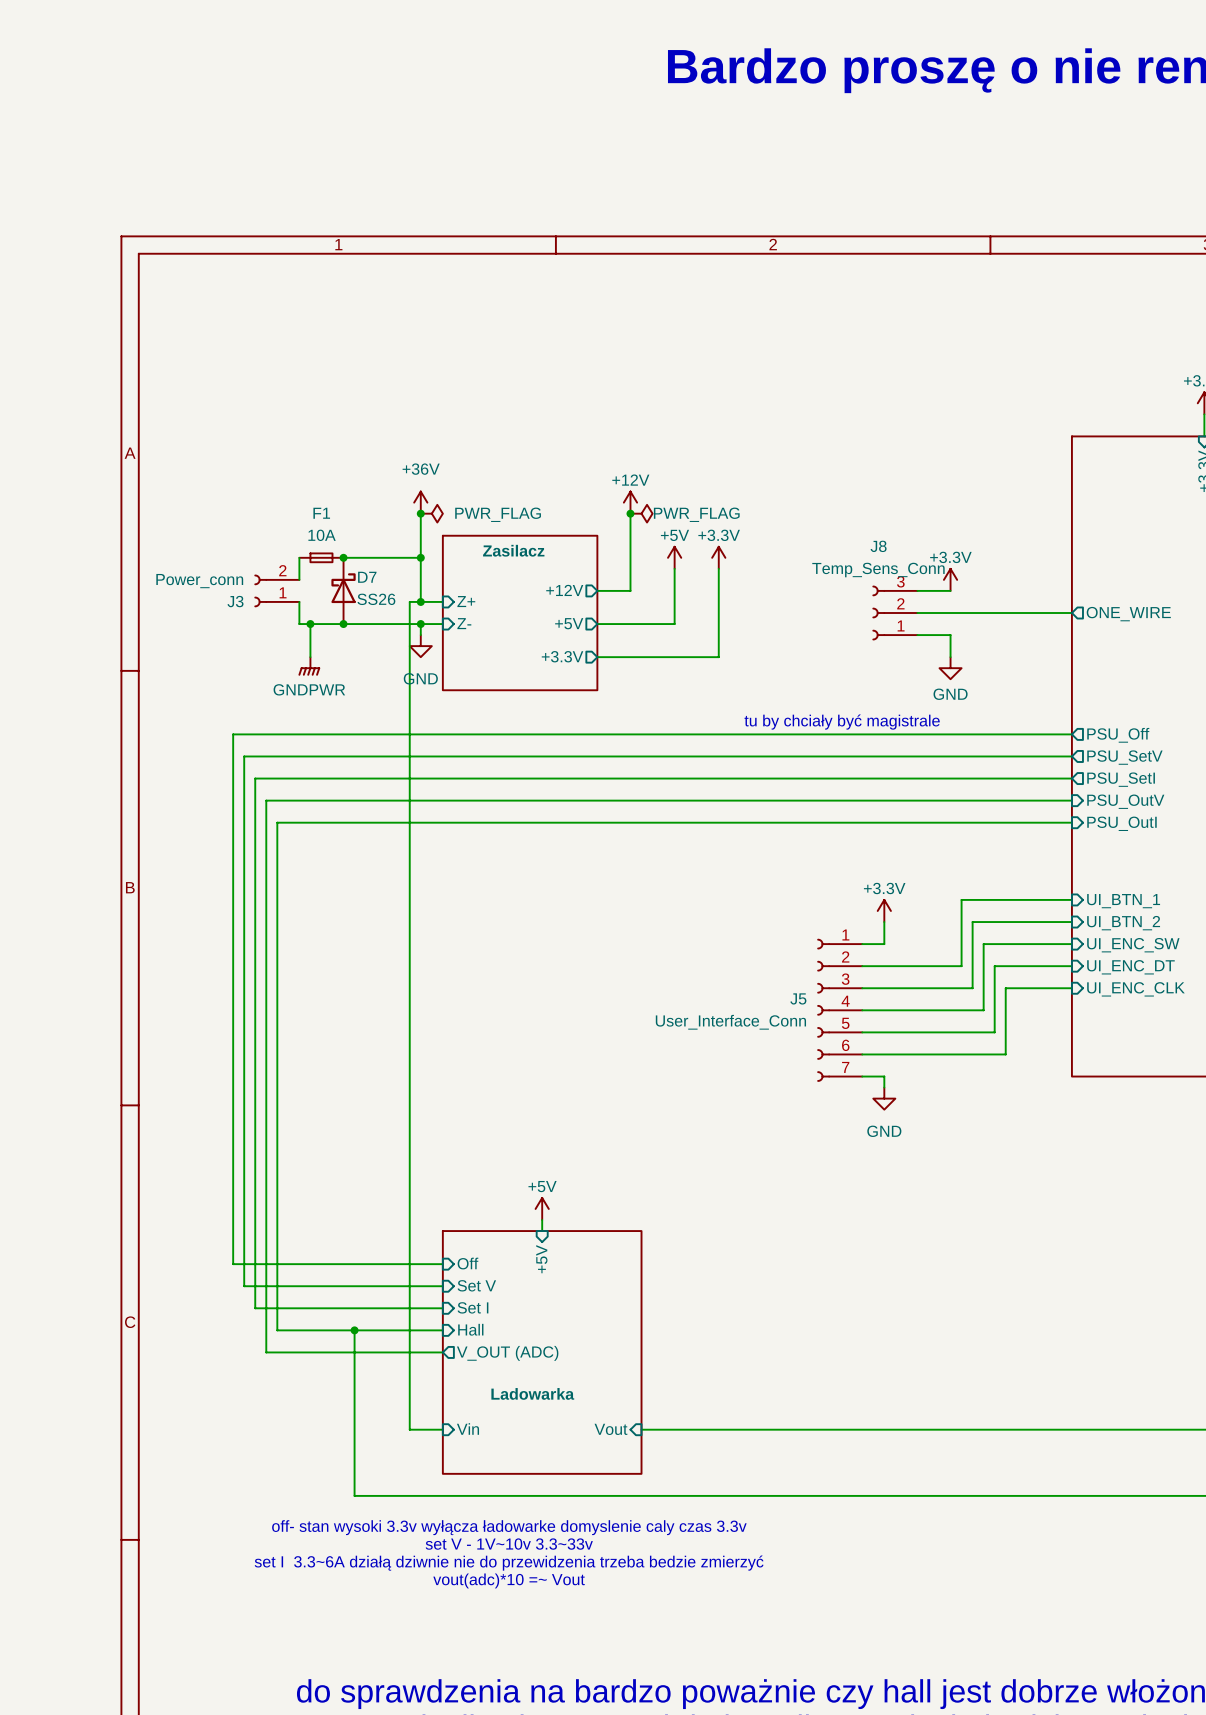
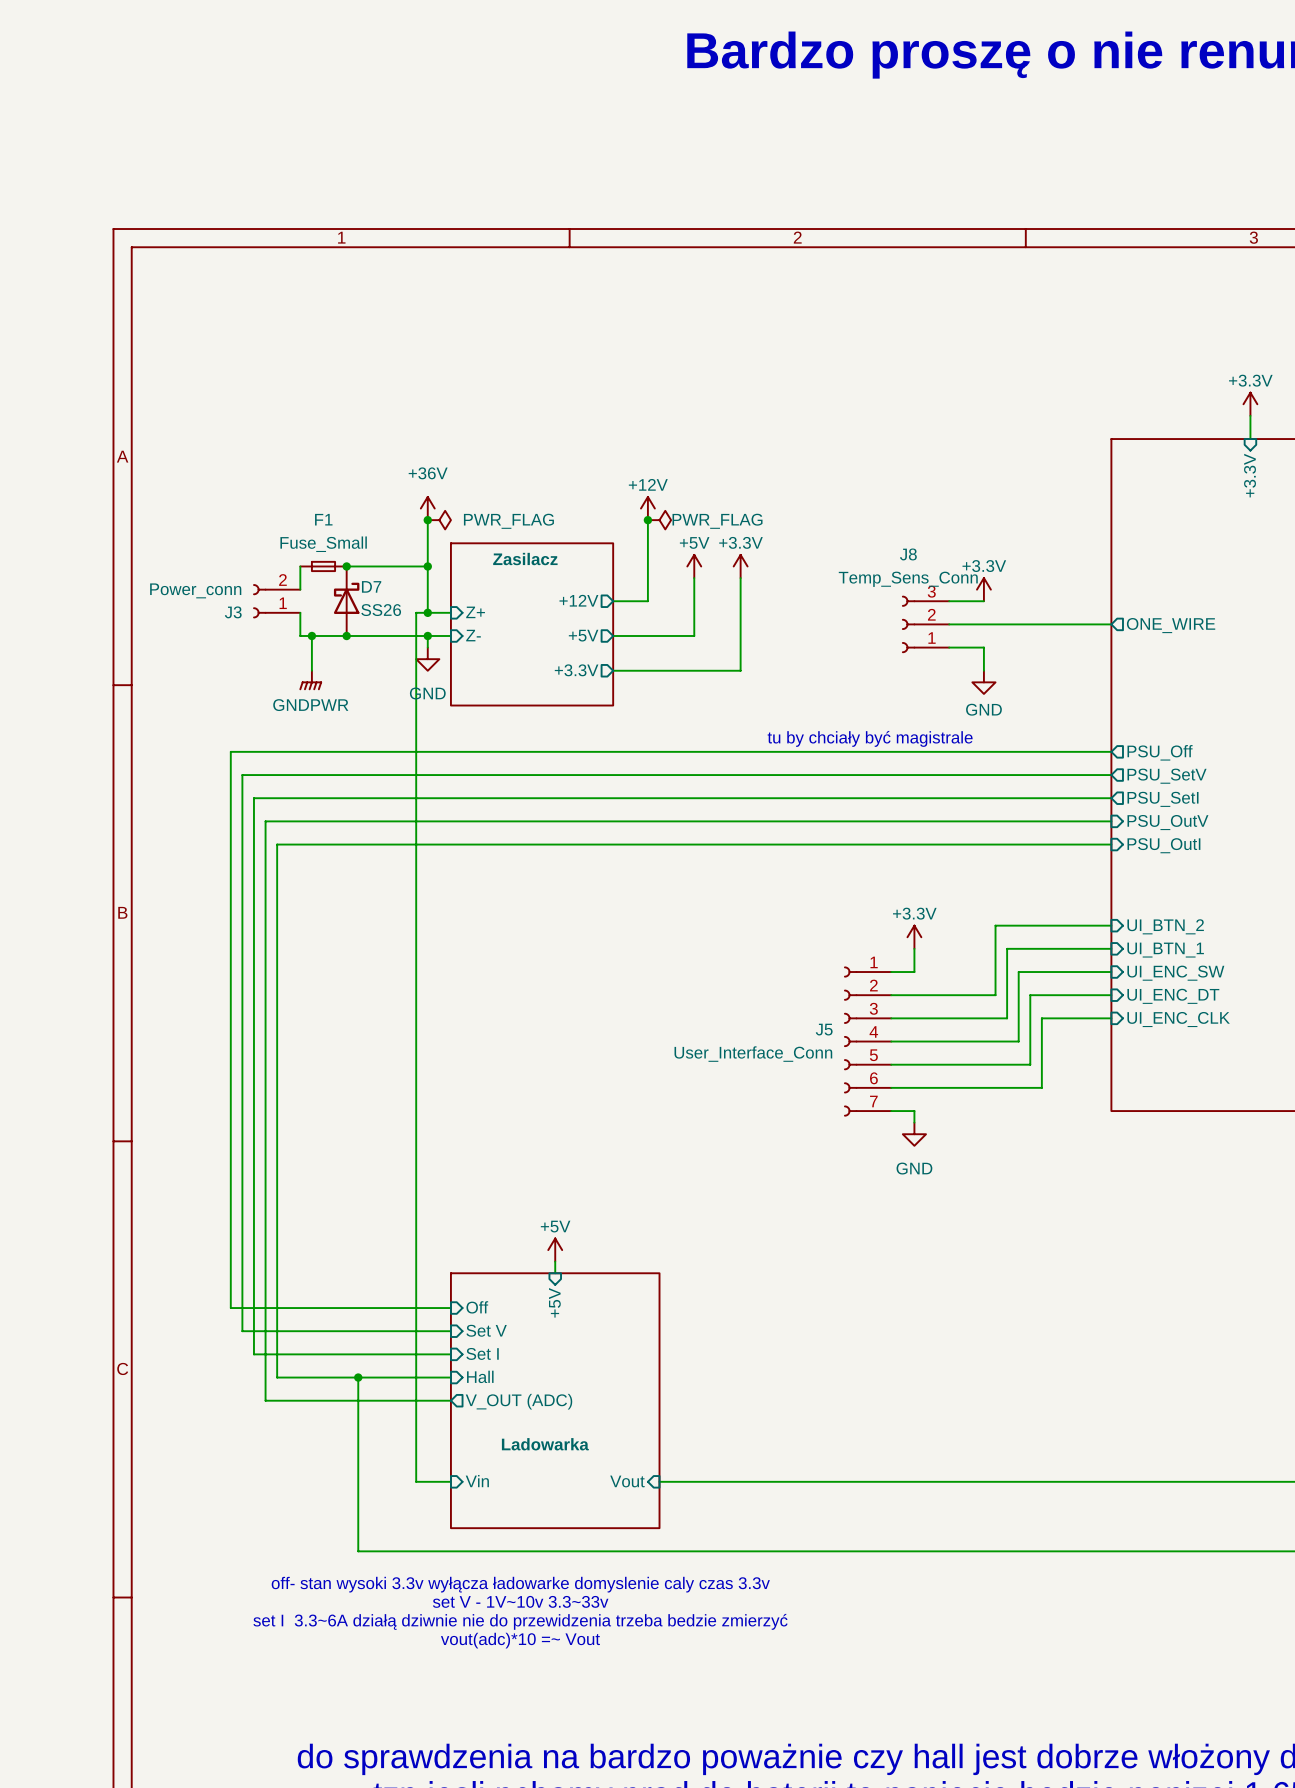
F1 value: 10A (322, 535) -> Fuse_Small (323, 544)
sheet pin: UI_BTN_1 (1123, 901) -> UI_BTN_2 (1165, 926)
sheet pin: UI_BTN_2 (1123, 923) -> UI_BTN_1 (1165, 950)

